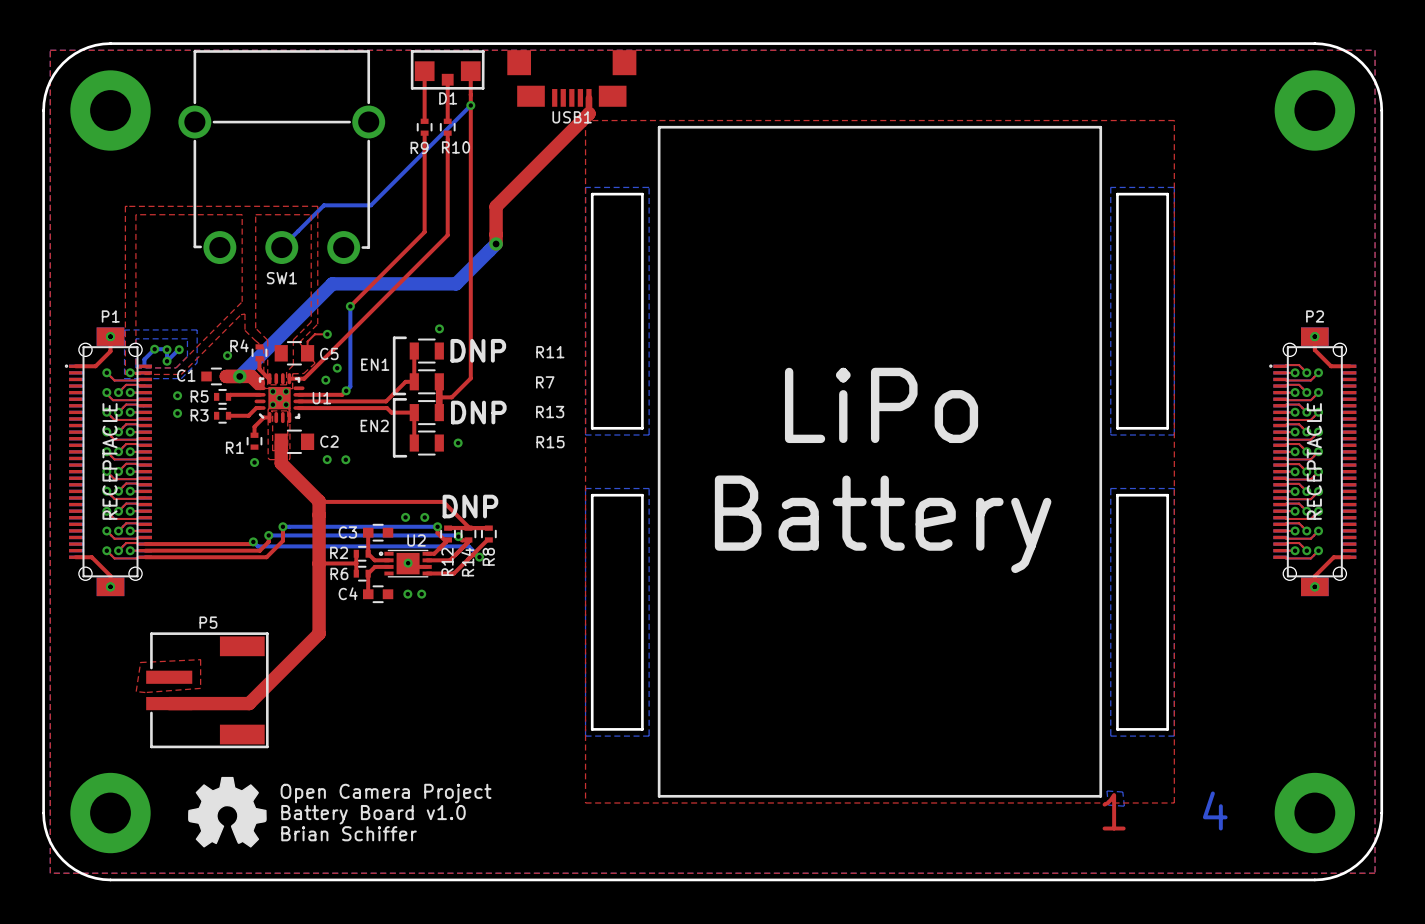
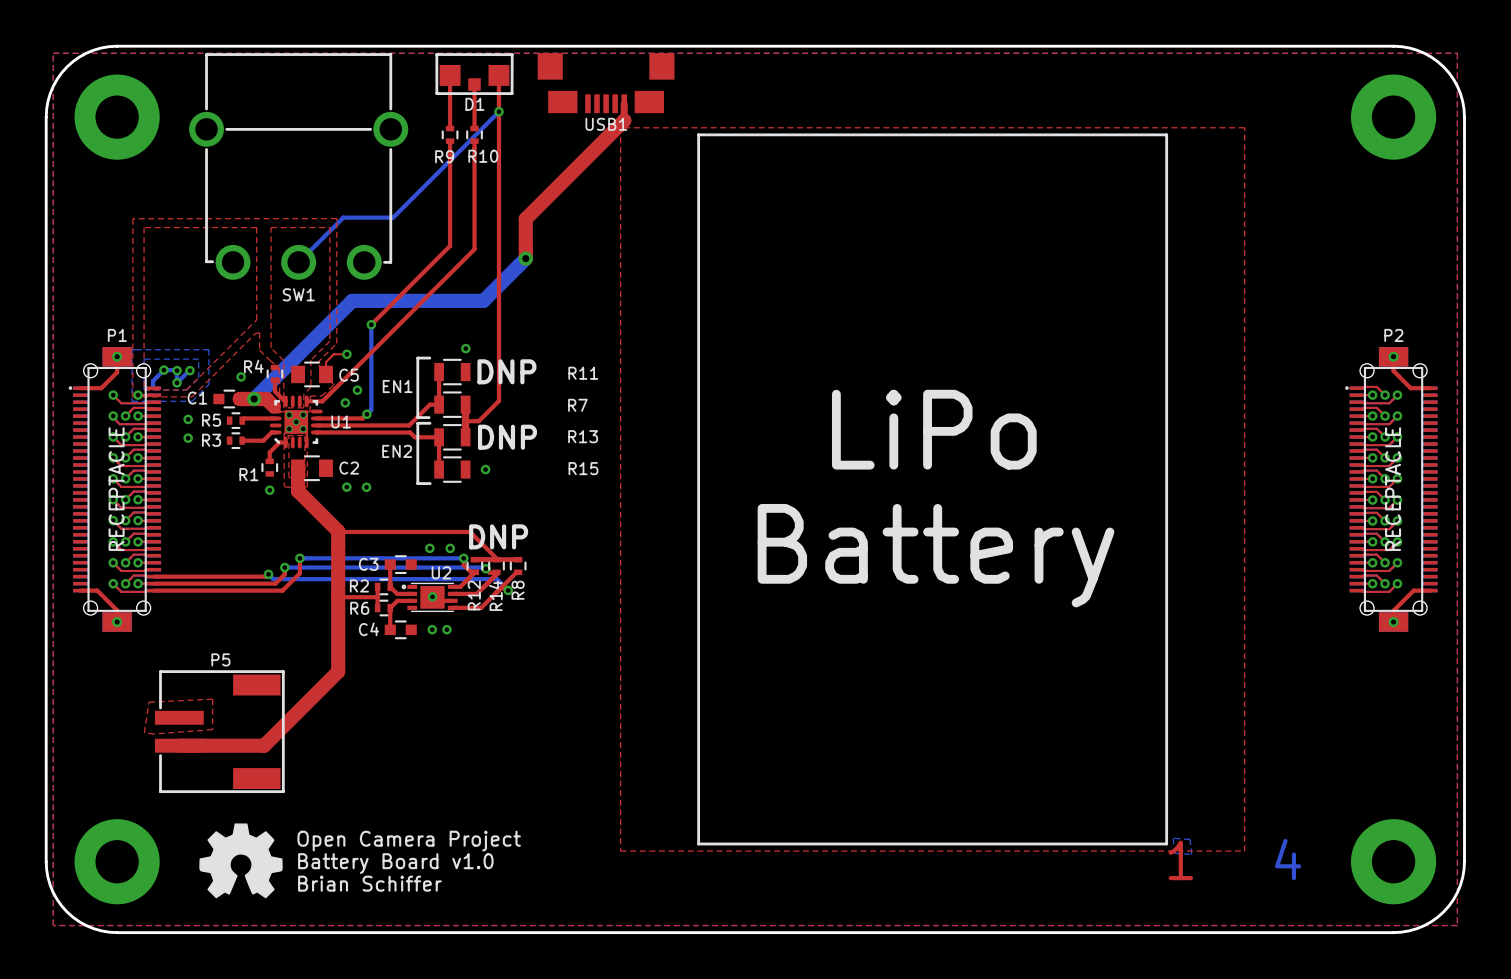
bottom zone outline: (585, 187) (585, 435) (649, 435) (649, 187) (585, 187) -> none
bottom zone outline: (1110, 187) (1174, 187) (1174, 435) (1110, 435) (1110, 187) -> none
board edge: (592, 194) (592, 428) (642, 428) (642, 194) (592, 194) -> none
board edge: (1117, 194) (1167, 194) (1167, 428) (1117, 428) (1117, 194) -> none
bottom zone outline: (585, 488) (649, 488) (649, 736) (585, 736) (585, 488) -> none
bottom zone outline: (1110, 488) (1174, 488) (1174, 736) (1110, 736) (1110, 488) -> none
board edge: (592, 495) (642, 495) (642, 729) (592, 729) (592, 495) -> none
board edge: (1117, 495) (1167, 495) (1167, 729) (1117, 729) (1117, 495) -> none

